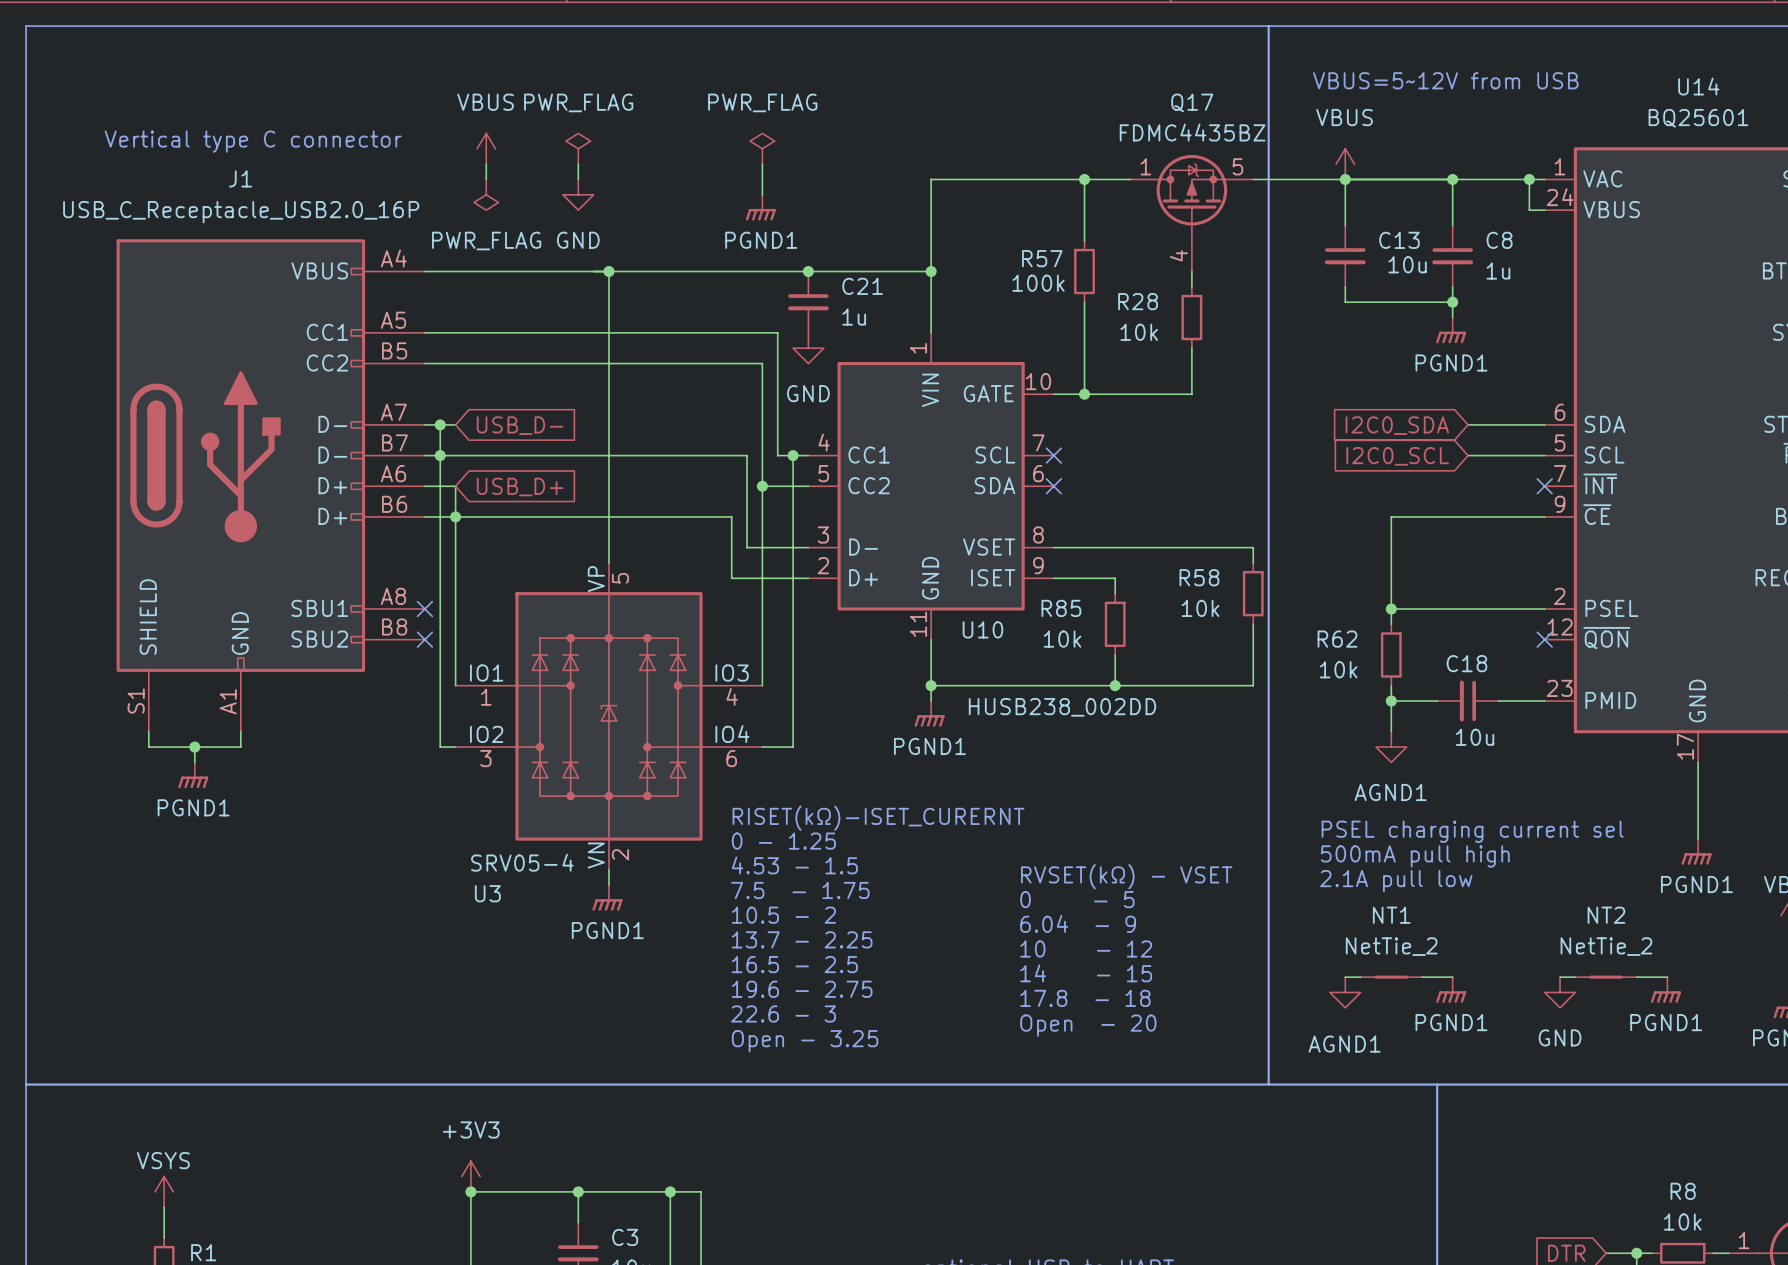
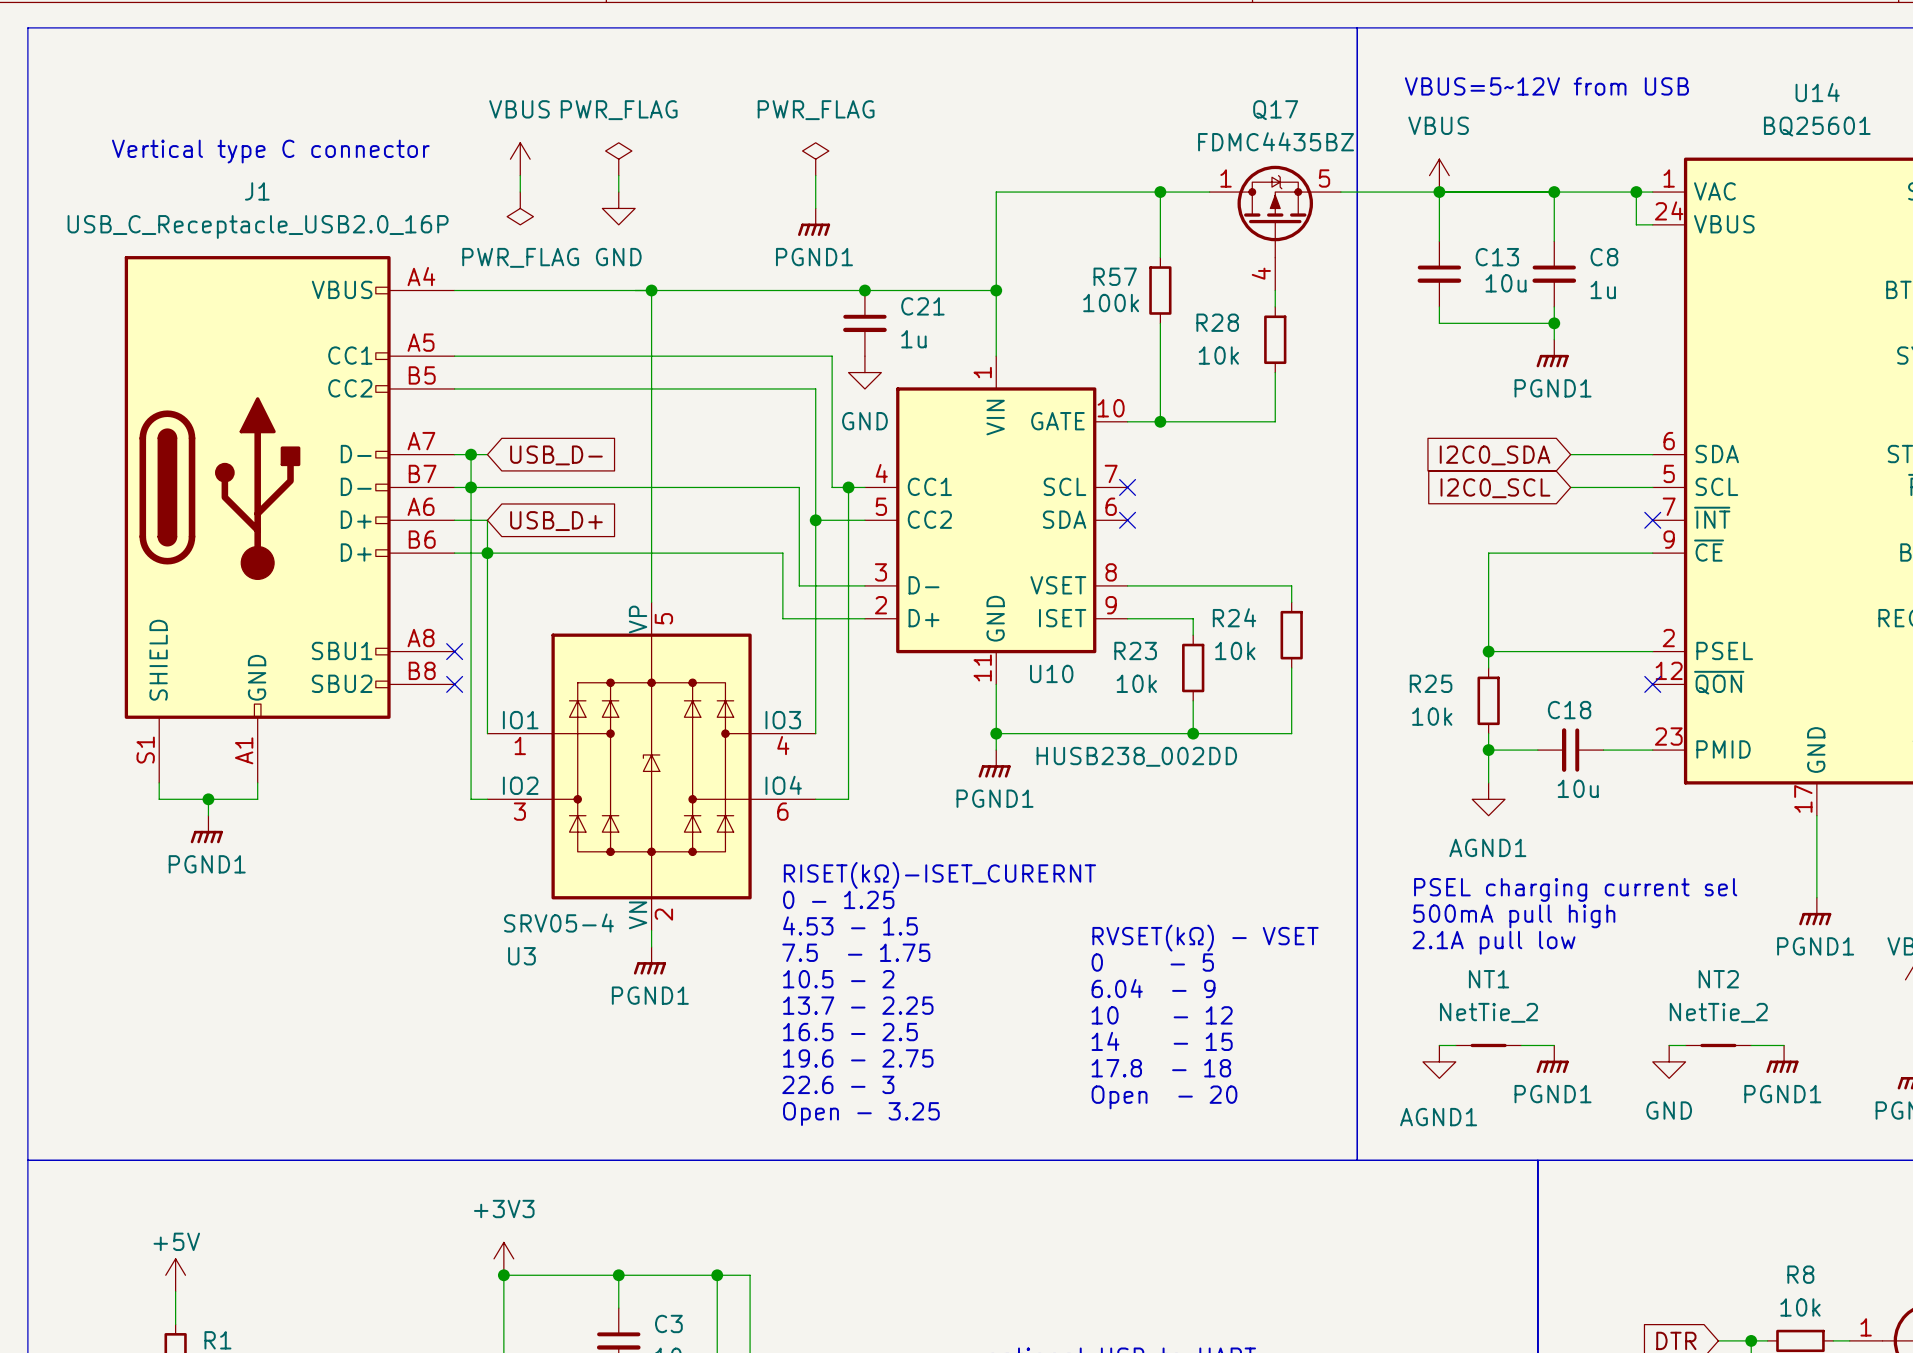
wire: (1207, 547) (1253, 547) (1253, 562) -> (1291, 585) (1291, 602)
R24: none -> 10k (1291, 635)
R58: 10k (1253, 593) -> none
R85 name: R85 (1061, 608) -> R23 (1135, 650)
wire: (1253, 624) (1253, 685) (1207, 685) -> (1291, 668) (1291, 733)
R62 name: R62 (1337, 639) -> R25 (1431, 683)
power symbol: VSYS (164, 1191) -> +5V (175, 1275)

